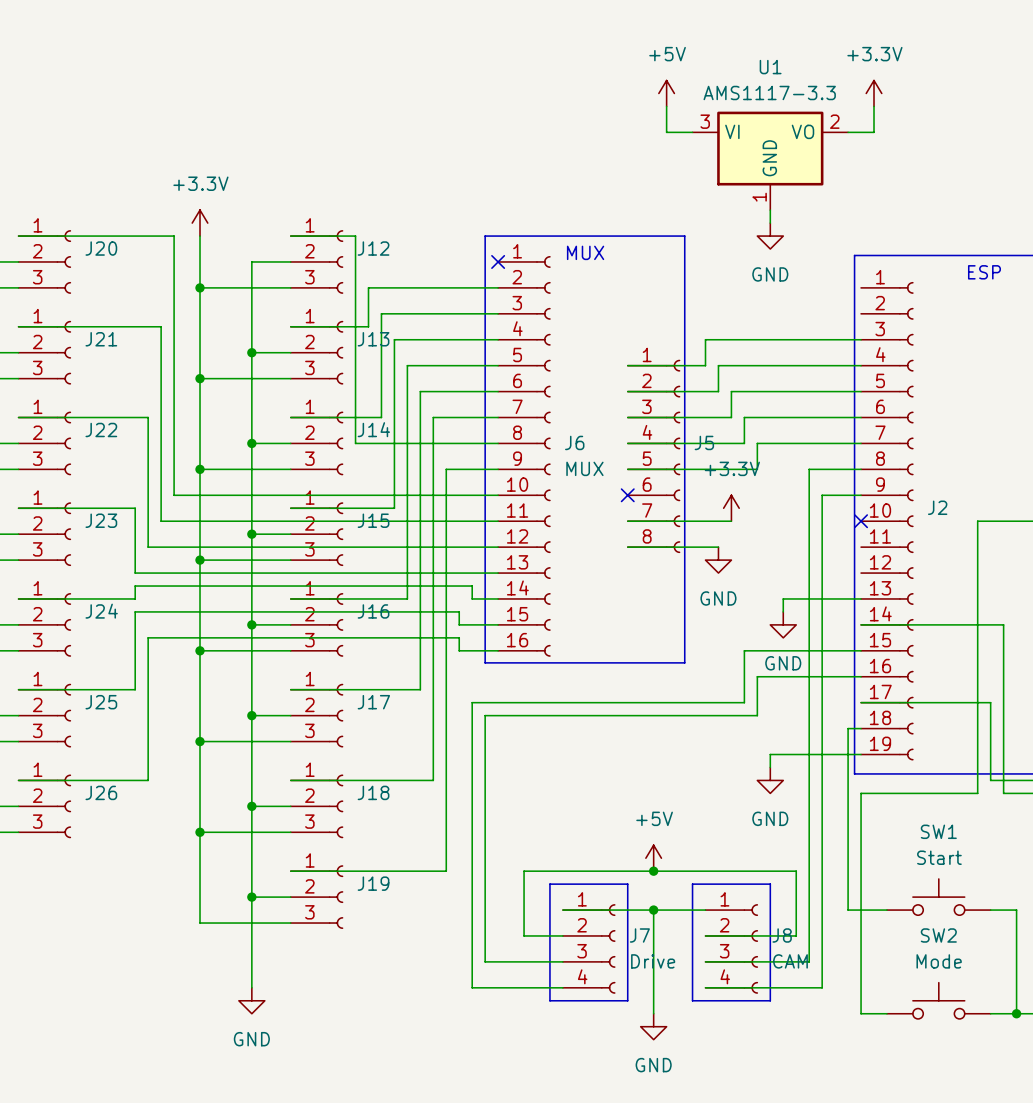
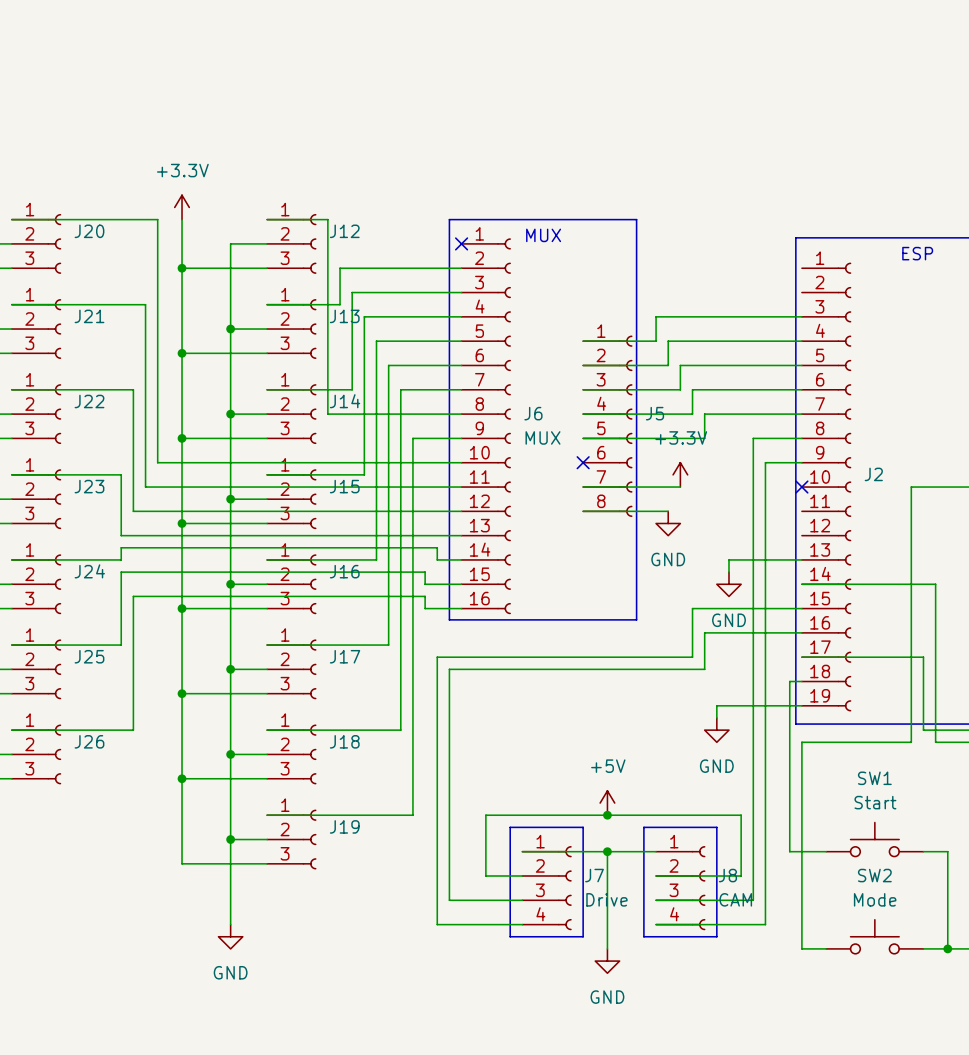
power symbol: +5V (666, 93) -> none
power symbol: +3.3V (874, 93) -> none
wire: (666, 106) (666, 132) (692, 132) -> none
wire: (874, 106) (874, 132) (848, 132) -> none
U1: AMS1117-3.3 (770, 160) -> none
wire: (770, 210) (770, 223) -> none
power symbol: GND (770, 236) -> none

